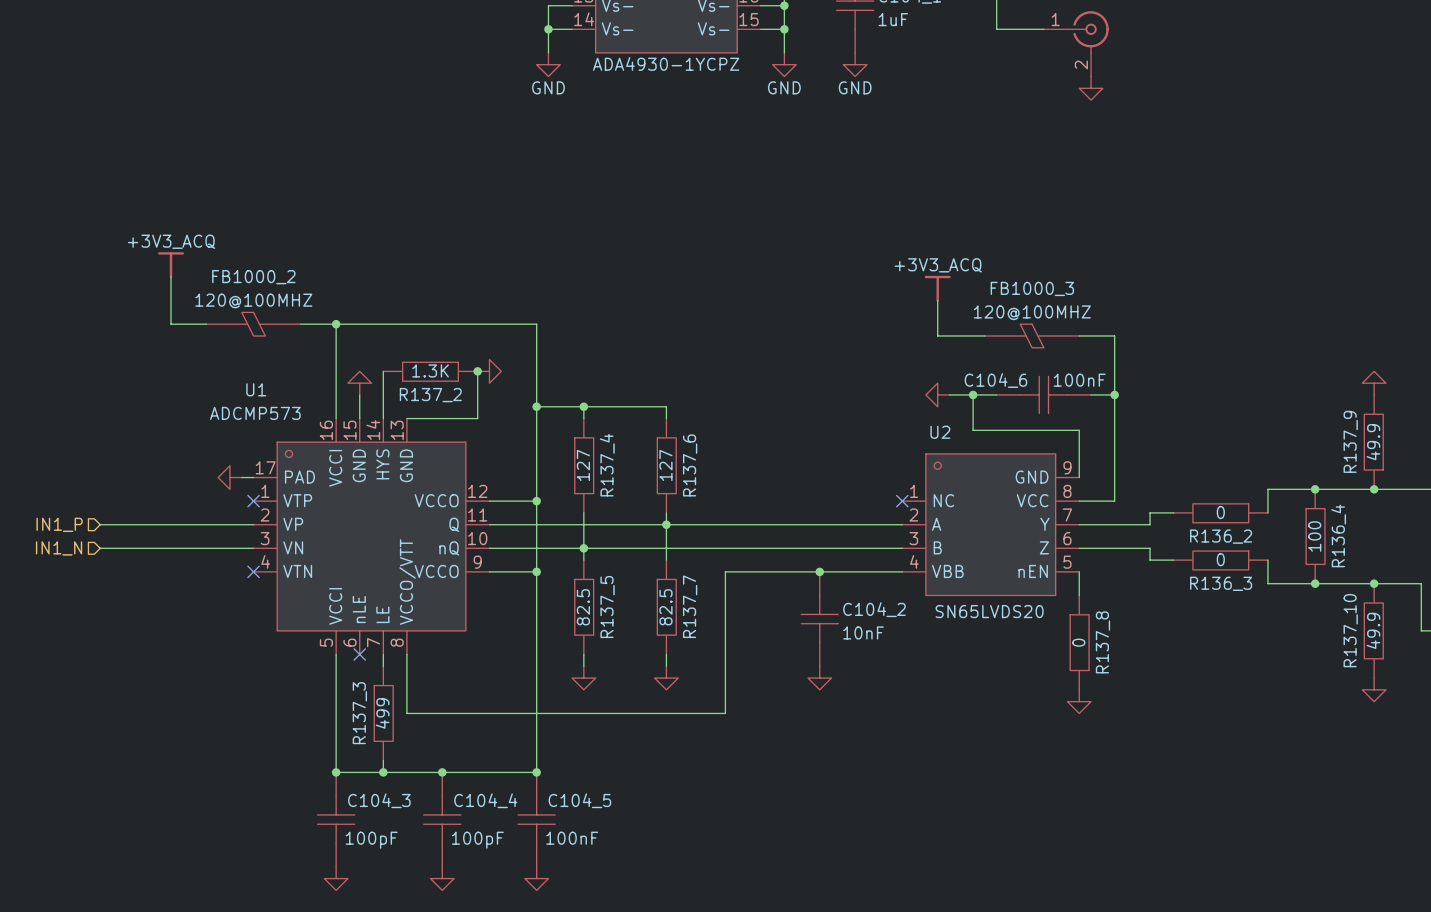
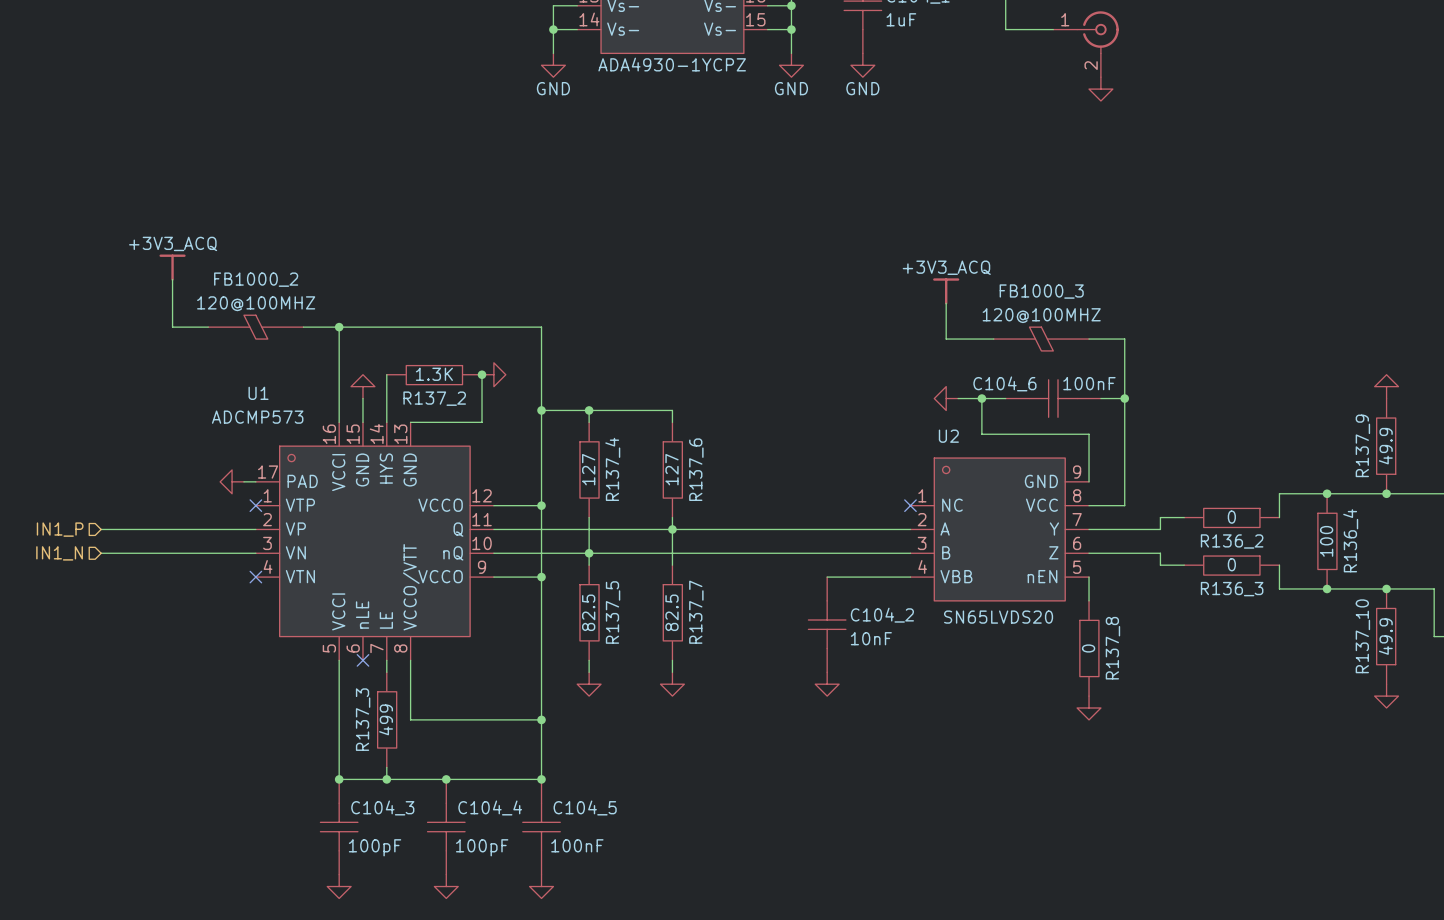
wire: (819, 571) (725, 571) (725, 713) (536, 713) -> none
junction: (819, 571) -> none
junction: none -> (541, 719)

